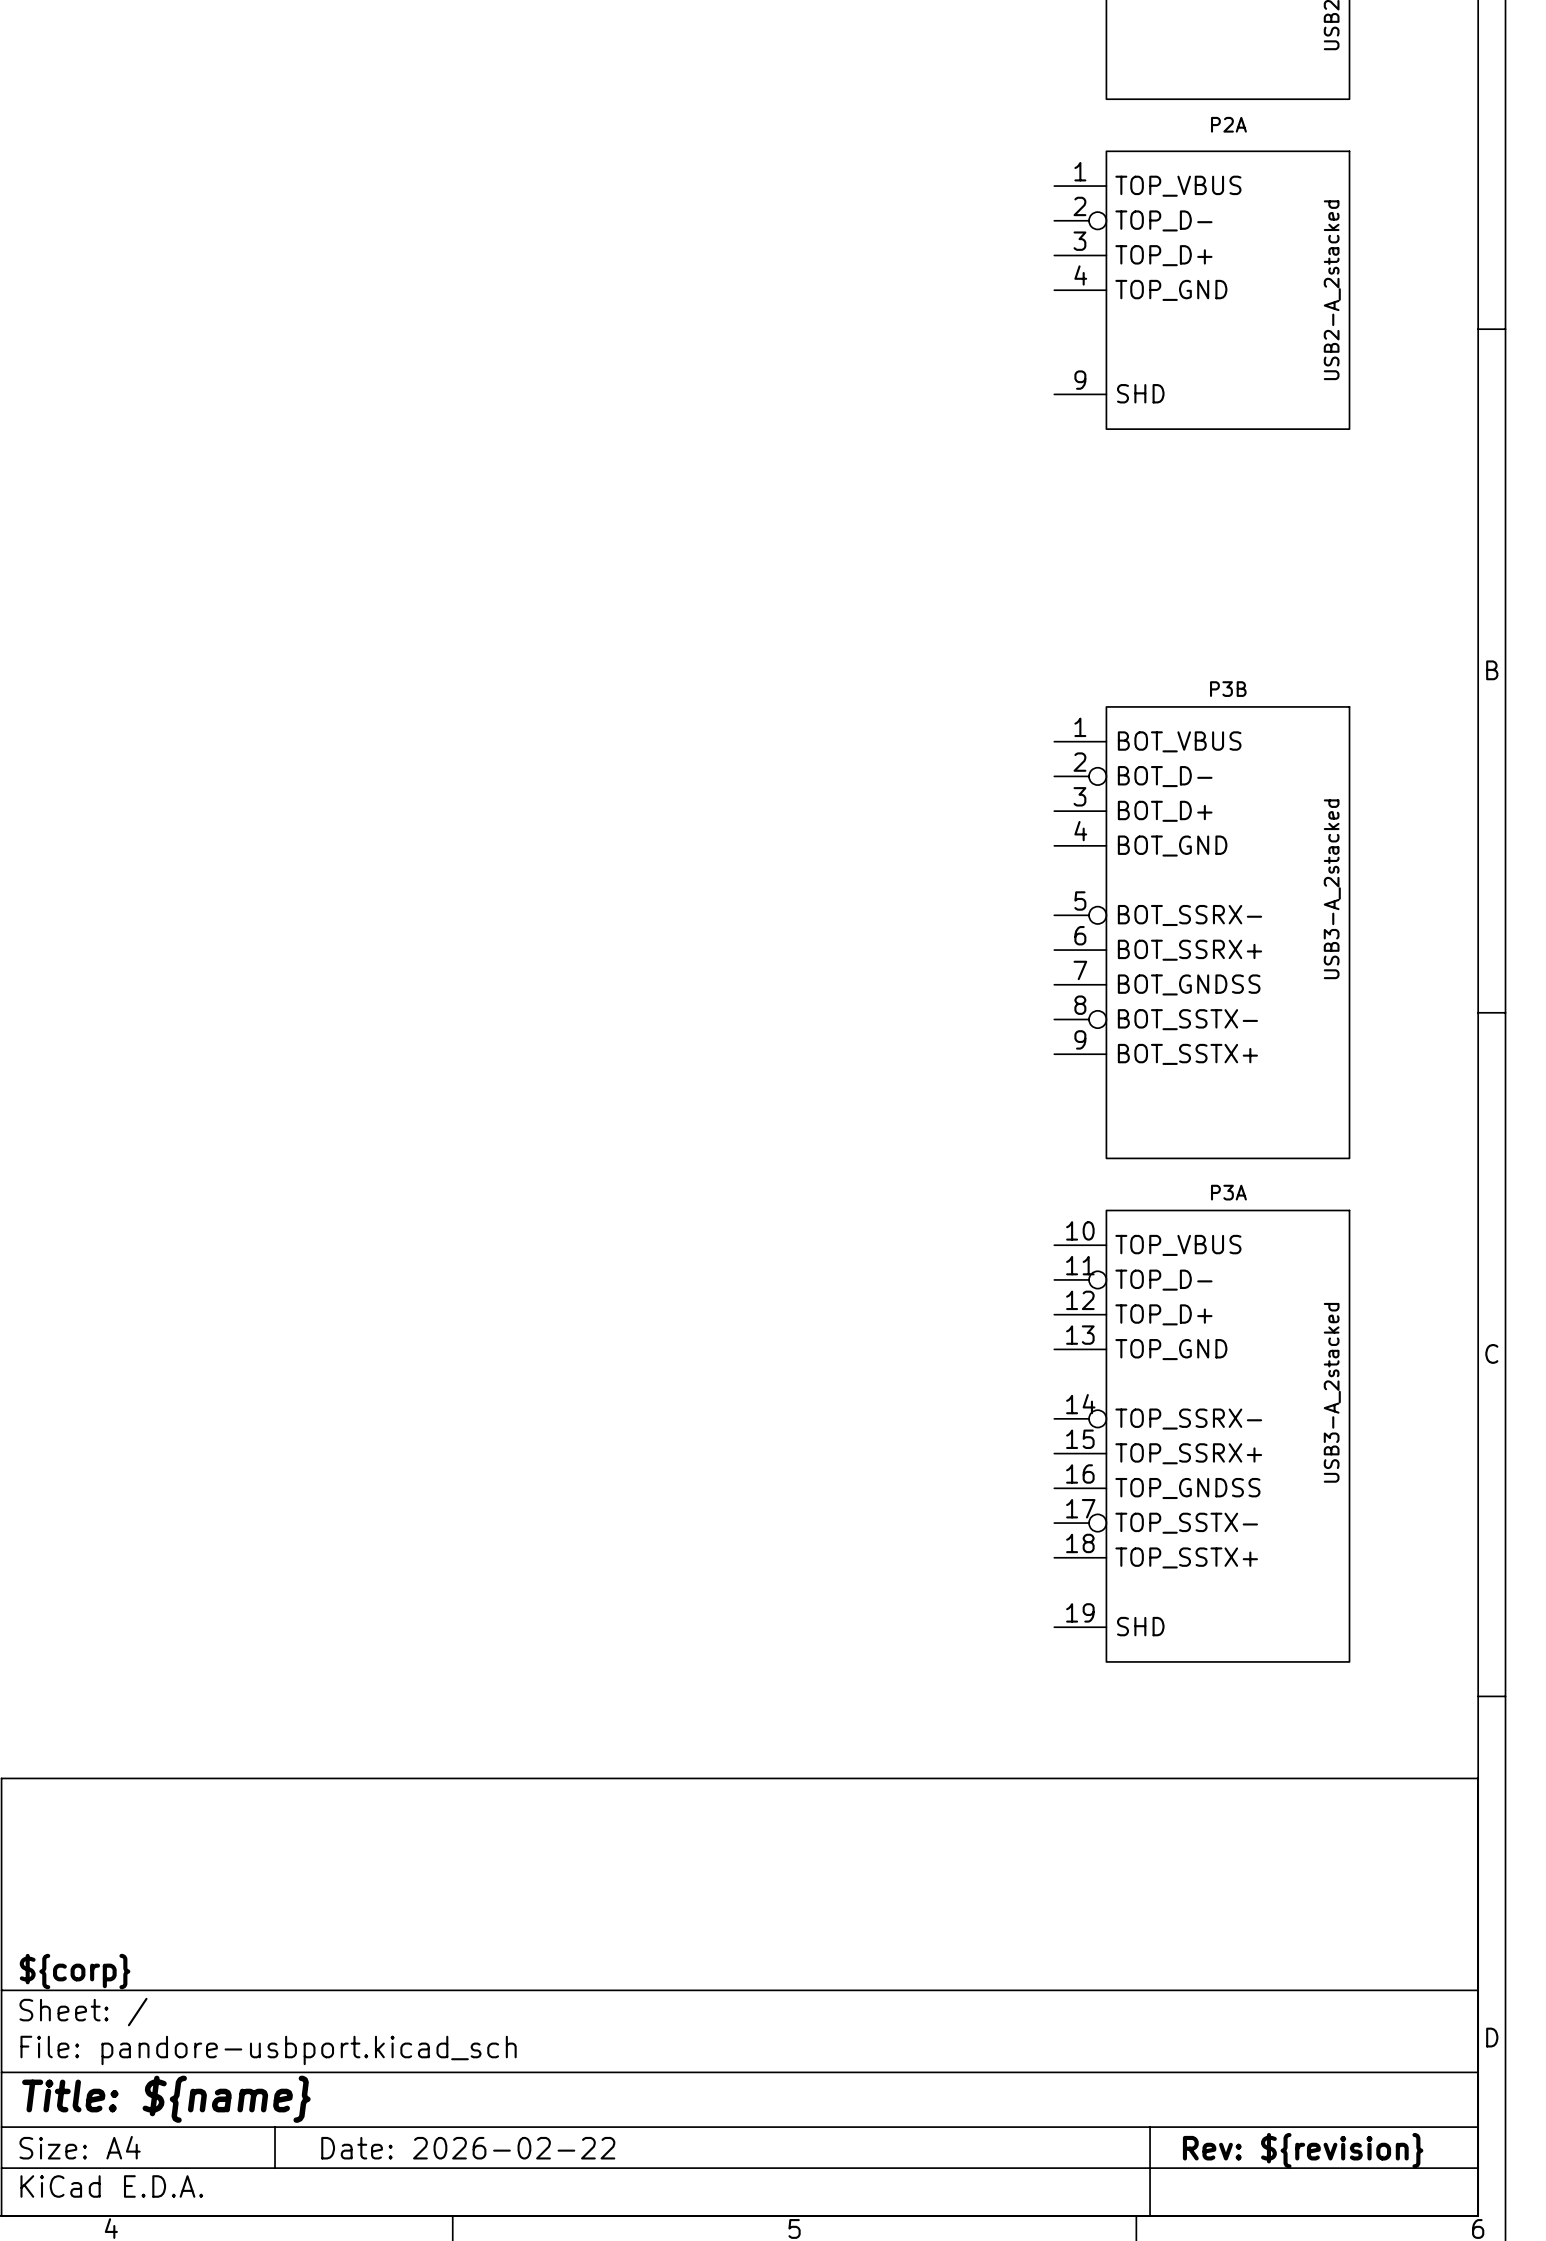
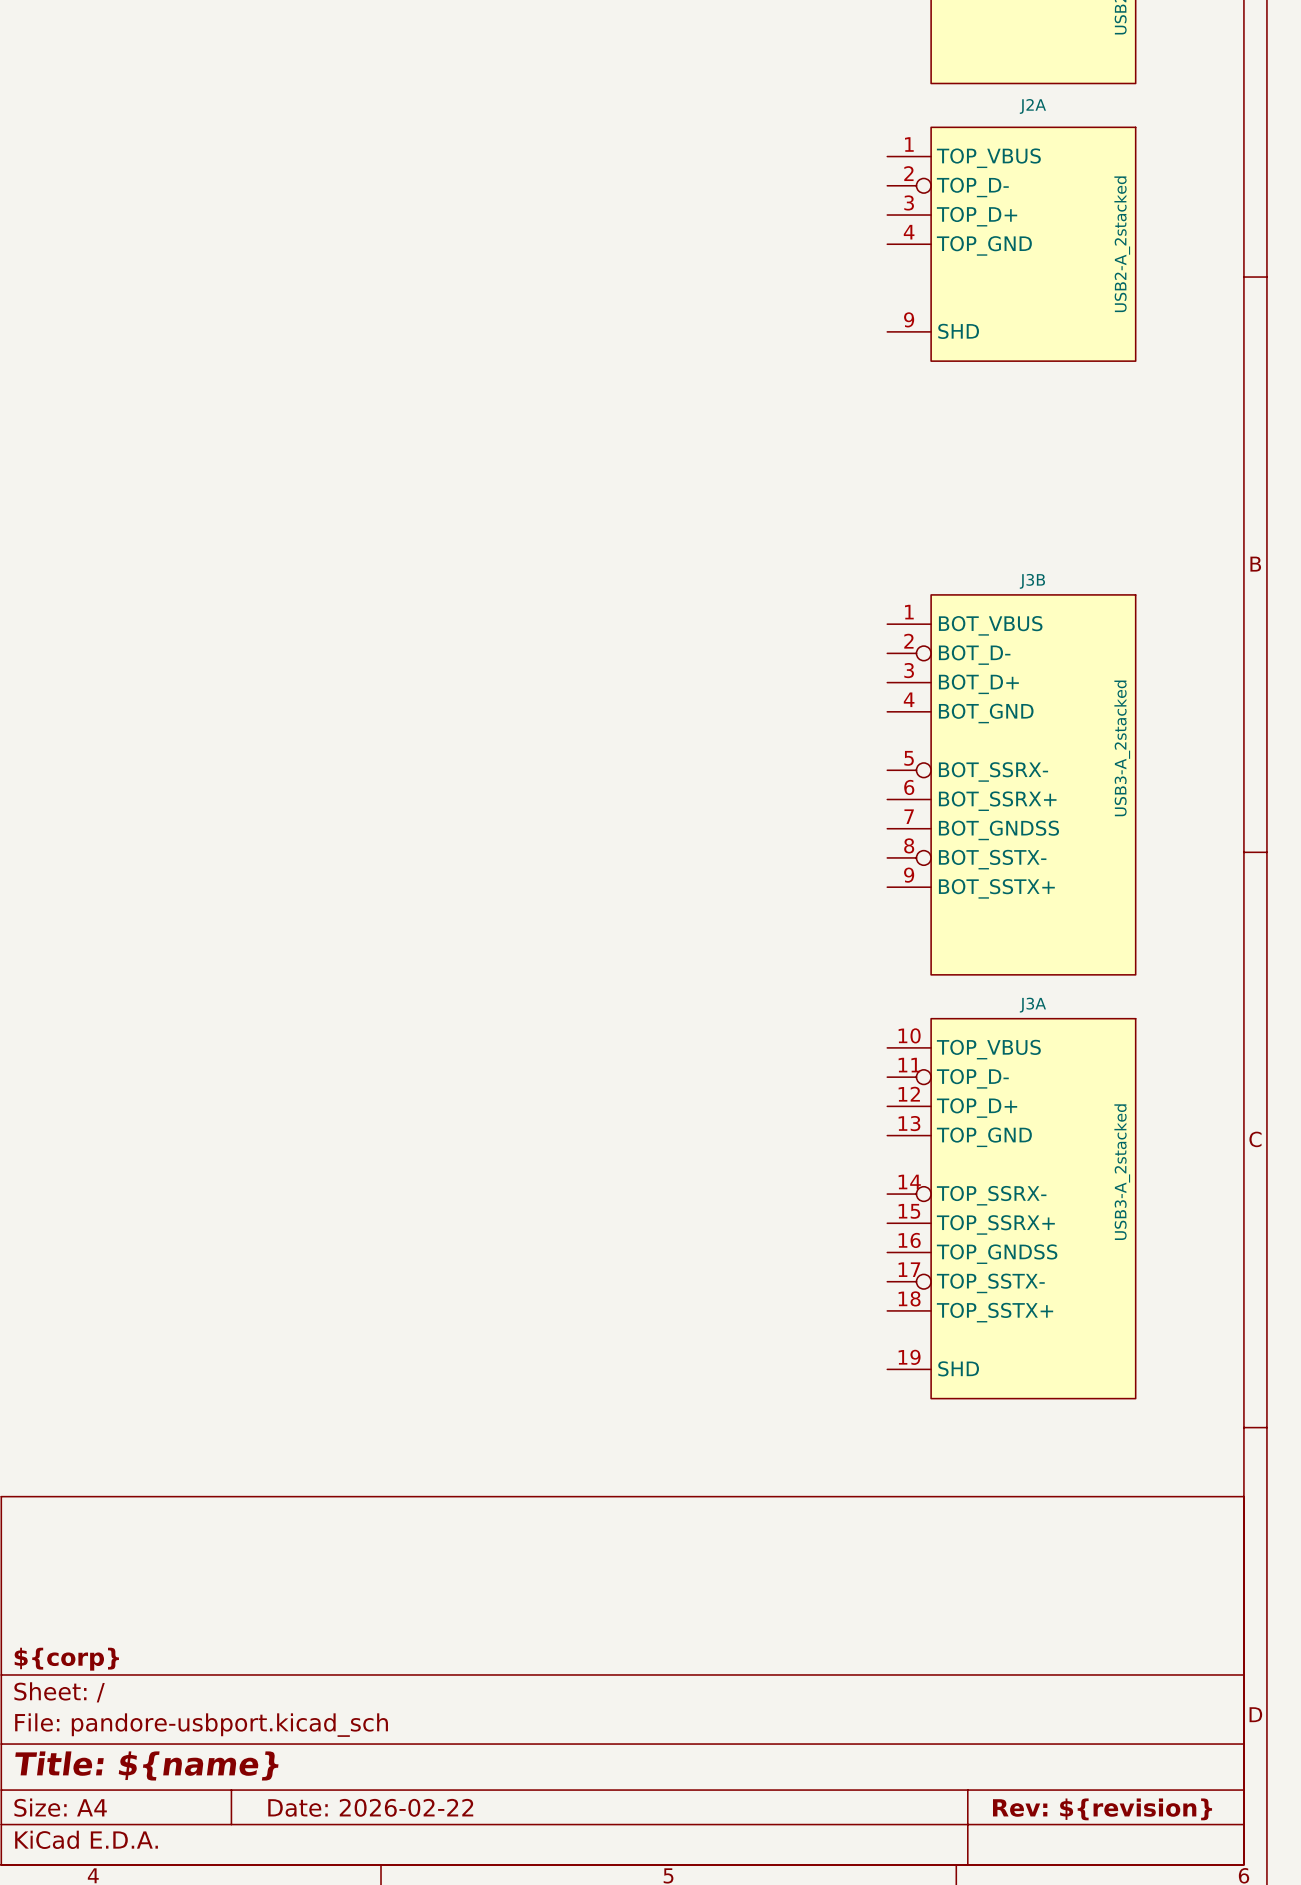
P2A name: P2A (1228, 124) -> J2A (1032, 106)
P3B name: P3B (1228, 689) -> J3B (1032, 581)
P3A name: P3A (1228, 1192) -> J3A (1032, 1005)

